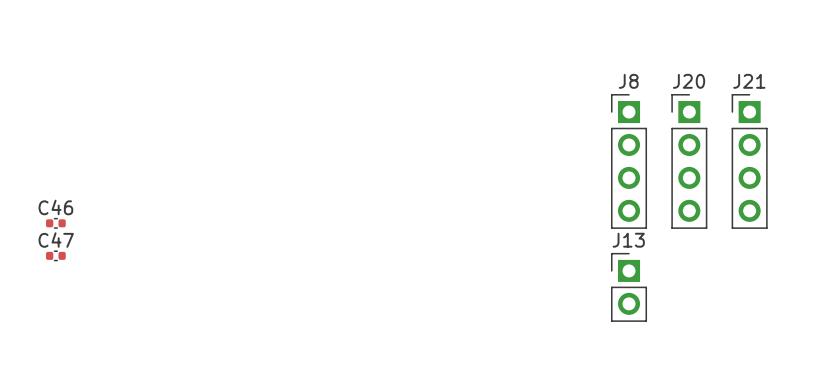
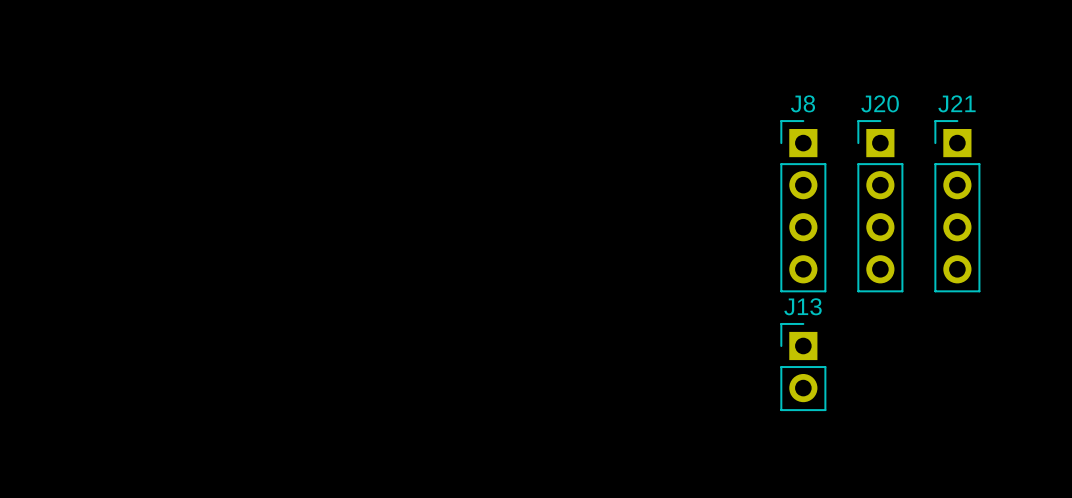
C46: (55, 223) -> none
C47: (55, 255) -> none

